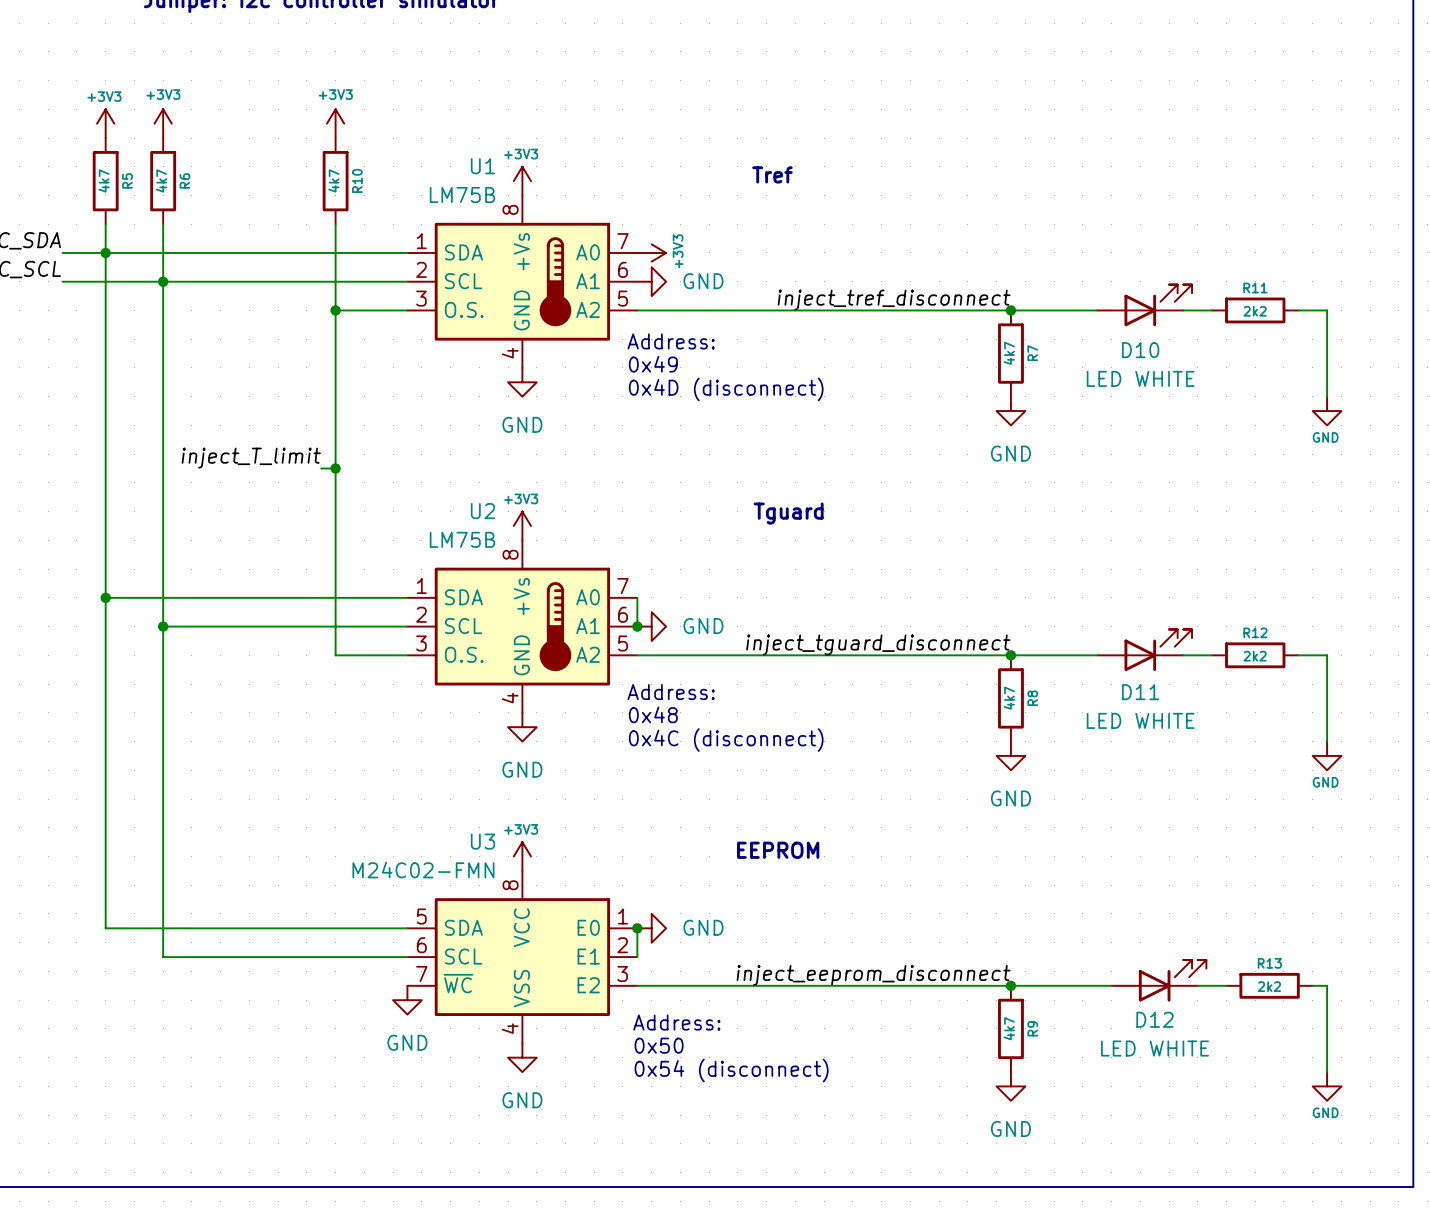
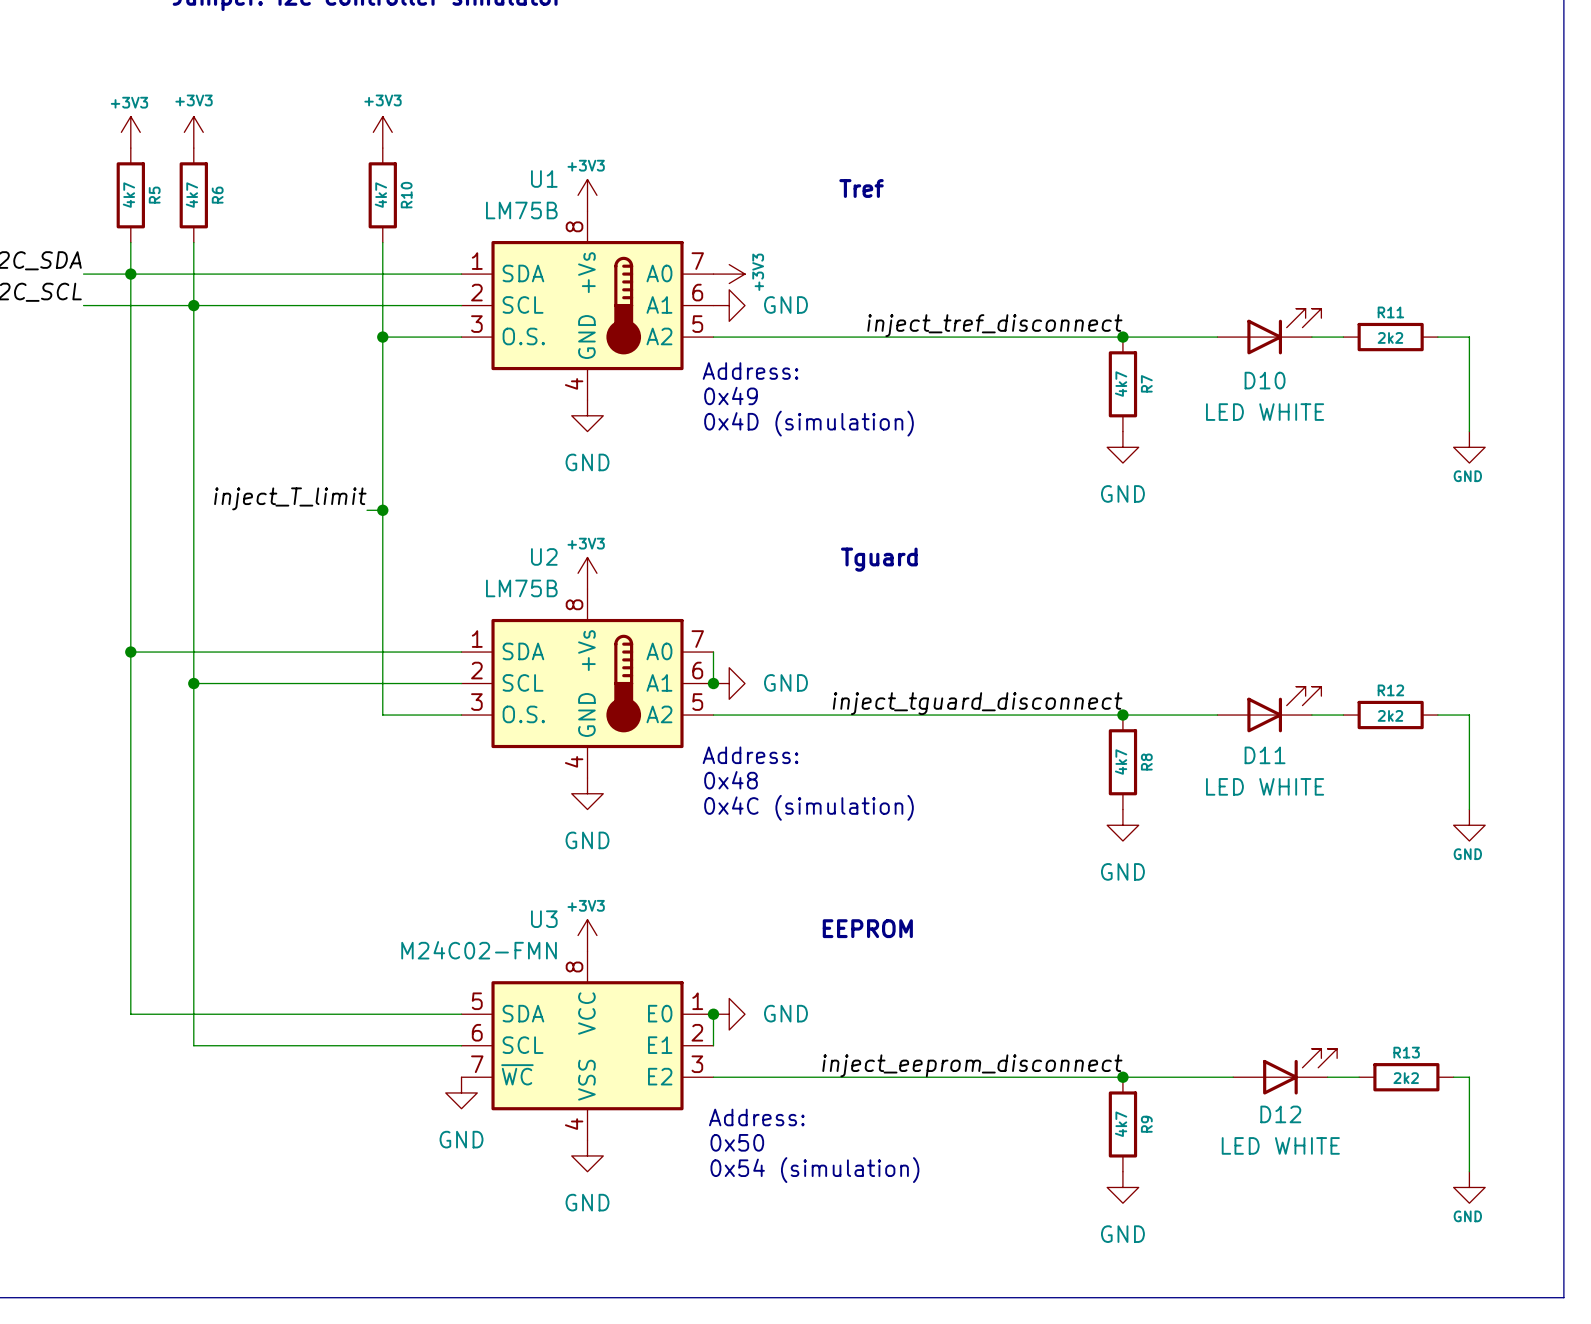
text: 0x4D (disconnect) (726, 389) -> 0x4D (simulation) (809, 423)
text: 0x4C (disconnect) (726, 740) -> 0x4C (simulation) (809, 807)
text: 0x54 (disconnect) (731, 1070) -> 0x54 (simulation) (814, 1170)

